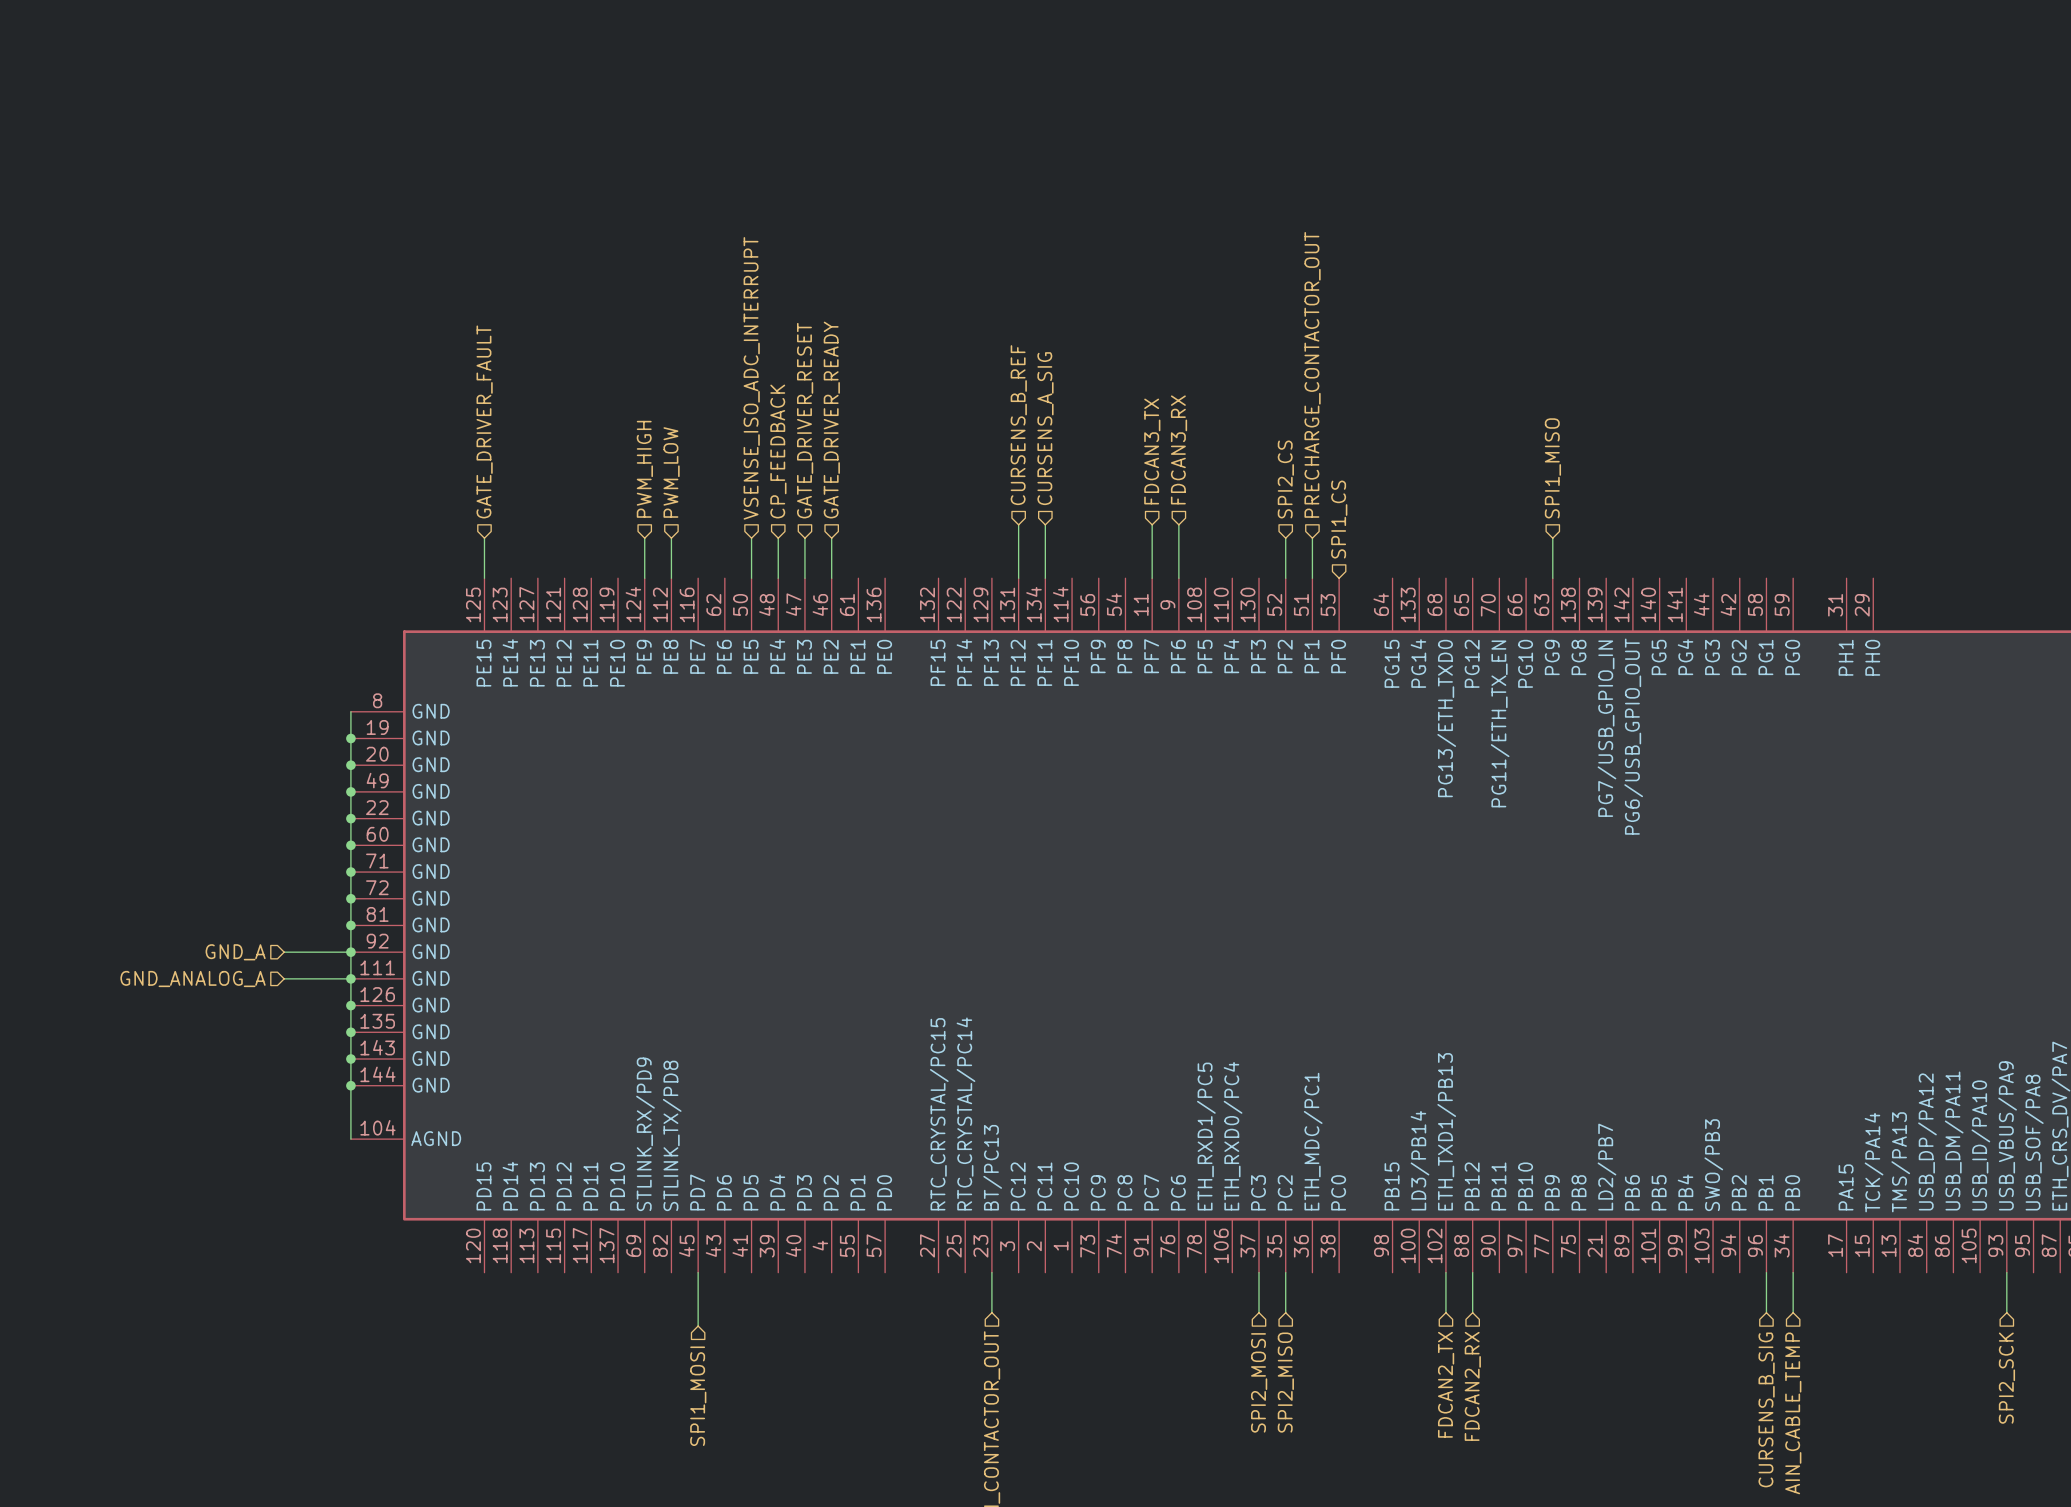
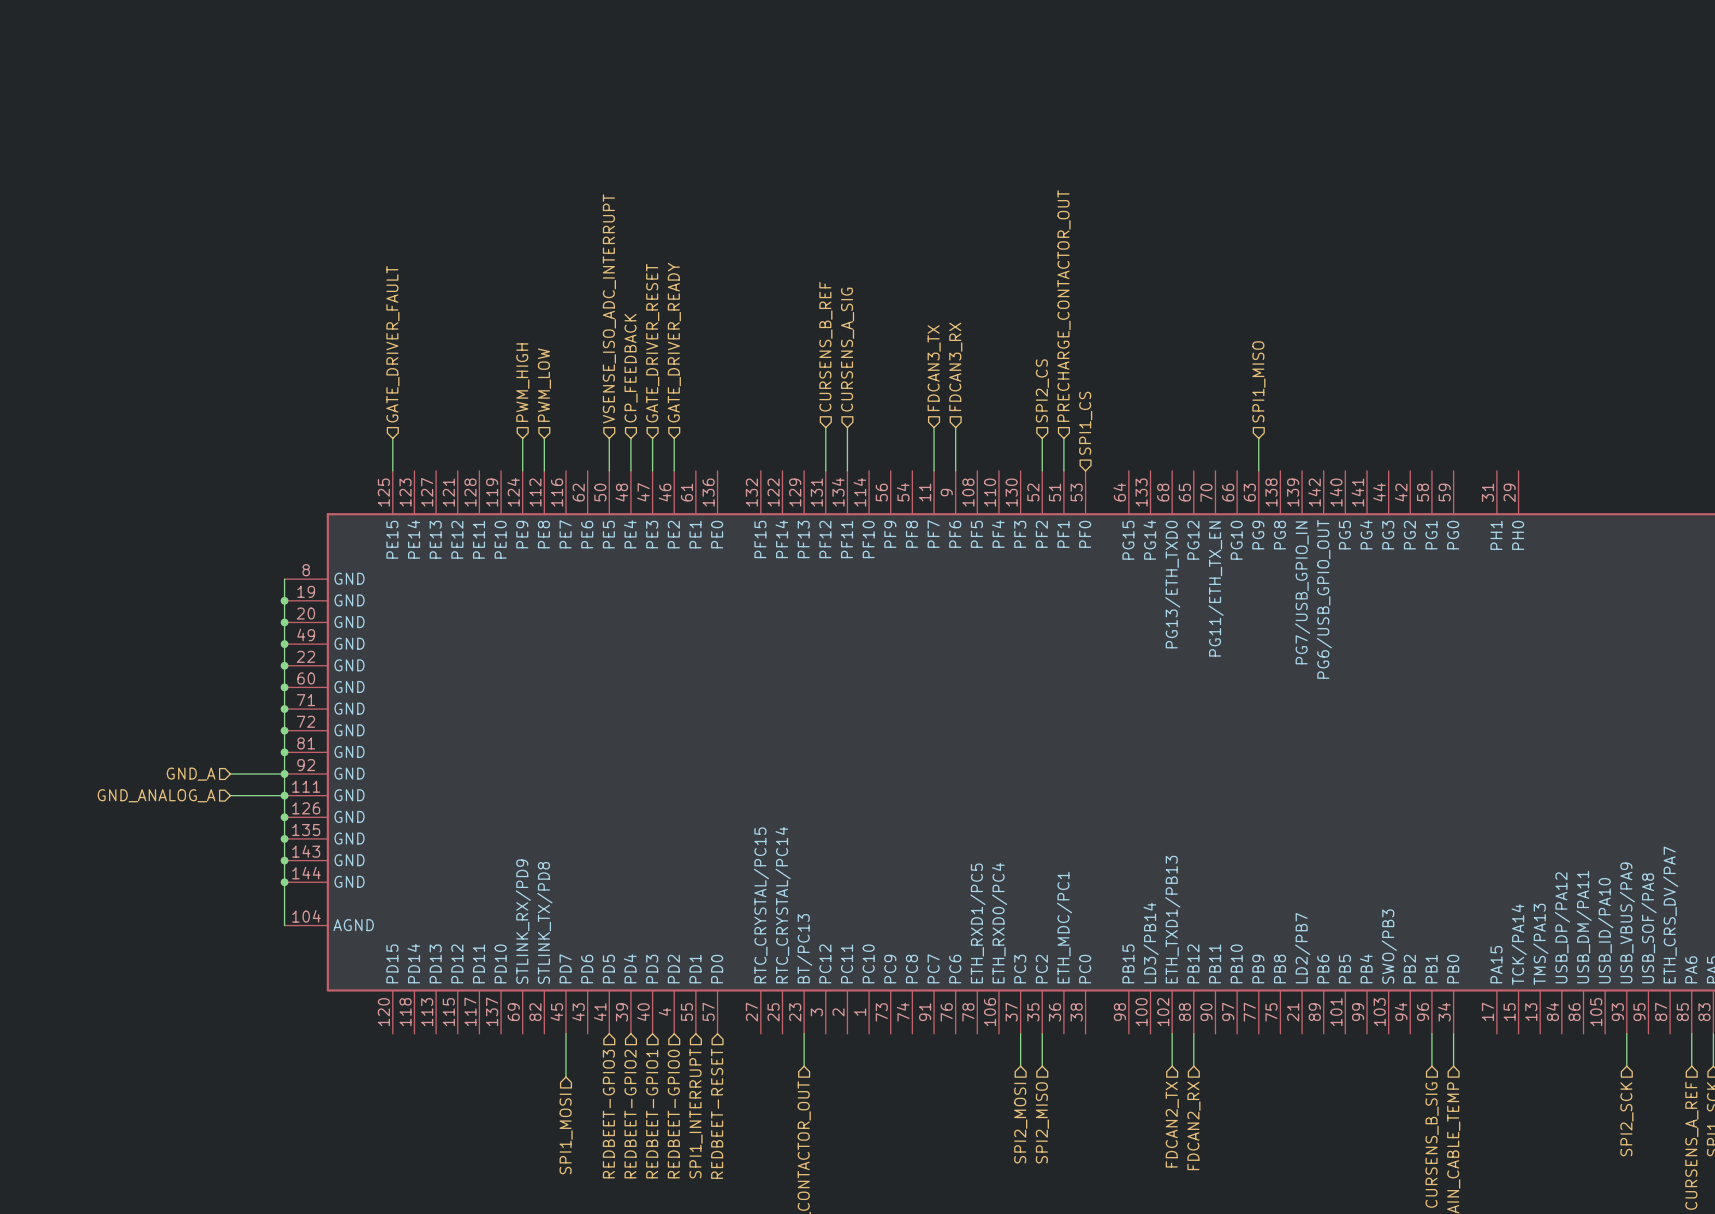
hierarchical label: none -> REDBEET-GPIO3 (608, 1114)
hierarchical label: none -> REDBEET-GPIO2 (630, 1114)
hierarchical label: none -> REDBEET-GPIO1 (652, 1114)
hierarchical label: none -> REDBEET-GPIO0 (673, 1114)
hierarchical label: none -> SPI1_INTERRUPT (695, 1113)
hierarchical label: none -> REDBEET-RESET (717, 1113)

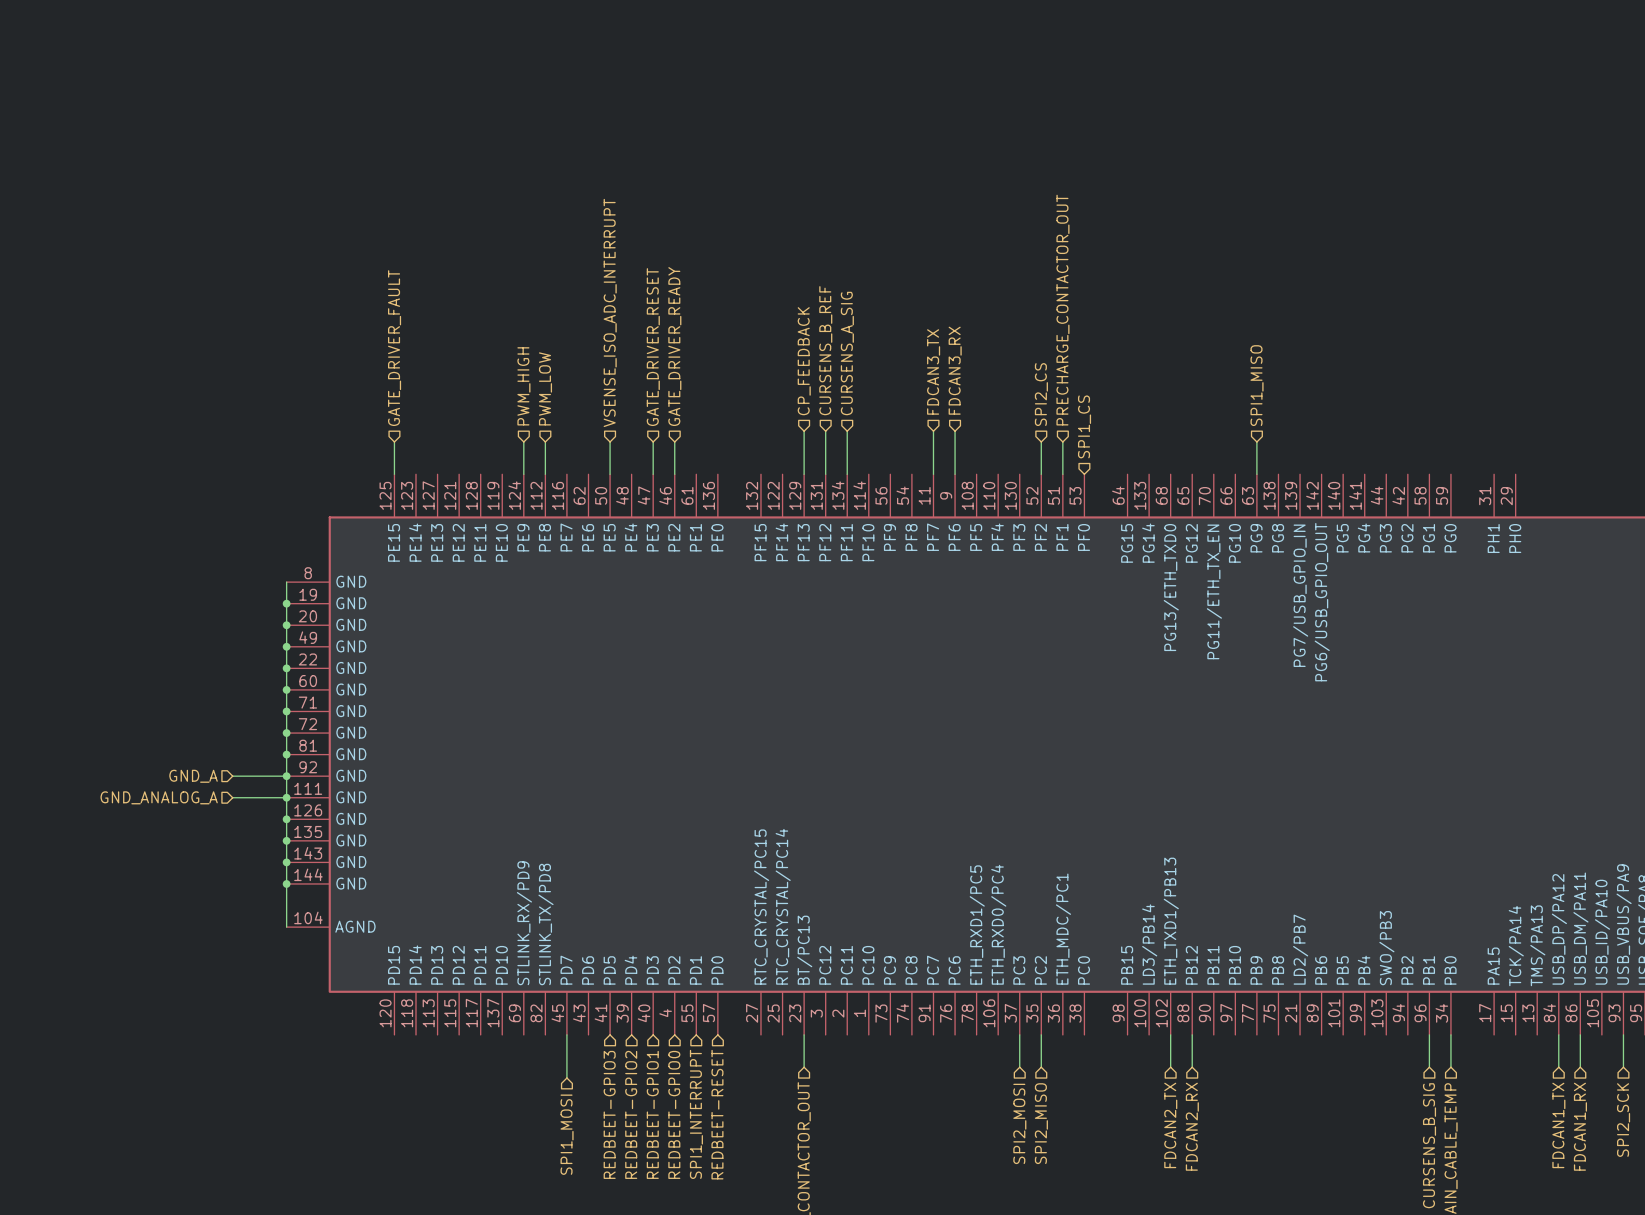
hierarchical label position: CP_FEEDBACK (631, 368) -> CP_FEEDBACK (804, 361)
wire: none -> (804, 431) (804, 474)
wire: (630, 438) (630, 470) -> none
wire: none -> (1558, 1034) (1558, 1067)
wire: none -> (1580, 1034) (1580, 1067)
hierarchical label: none -> FDCAN1_TX (1558, 1125)
hierarchical label: none -> FDCAN1_RX (1580, 1126)

